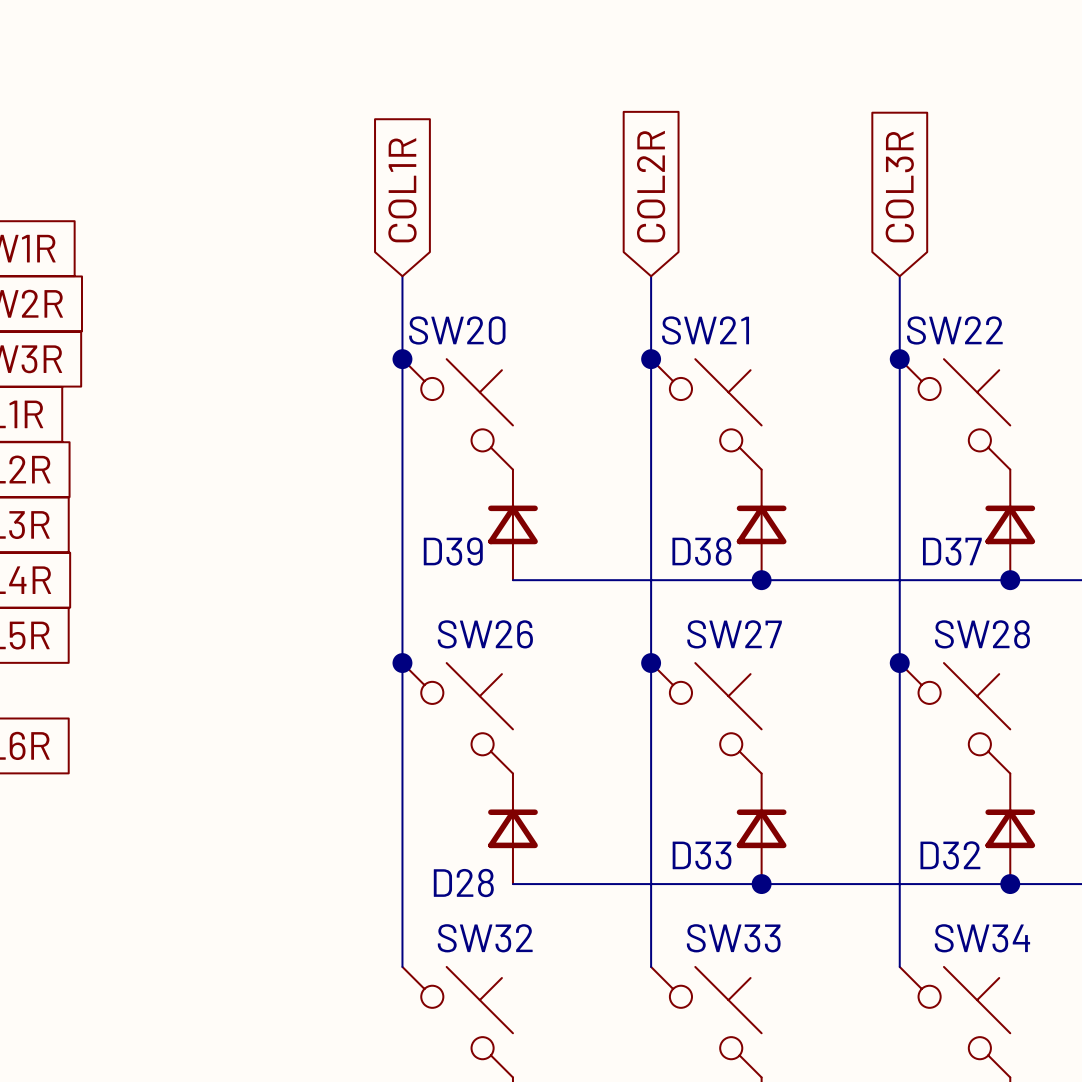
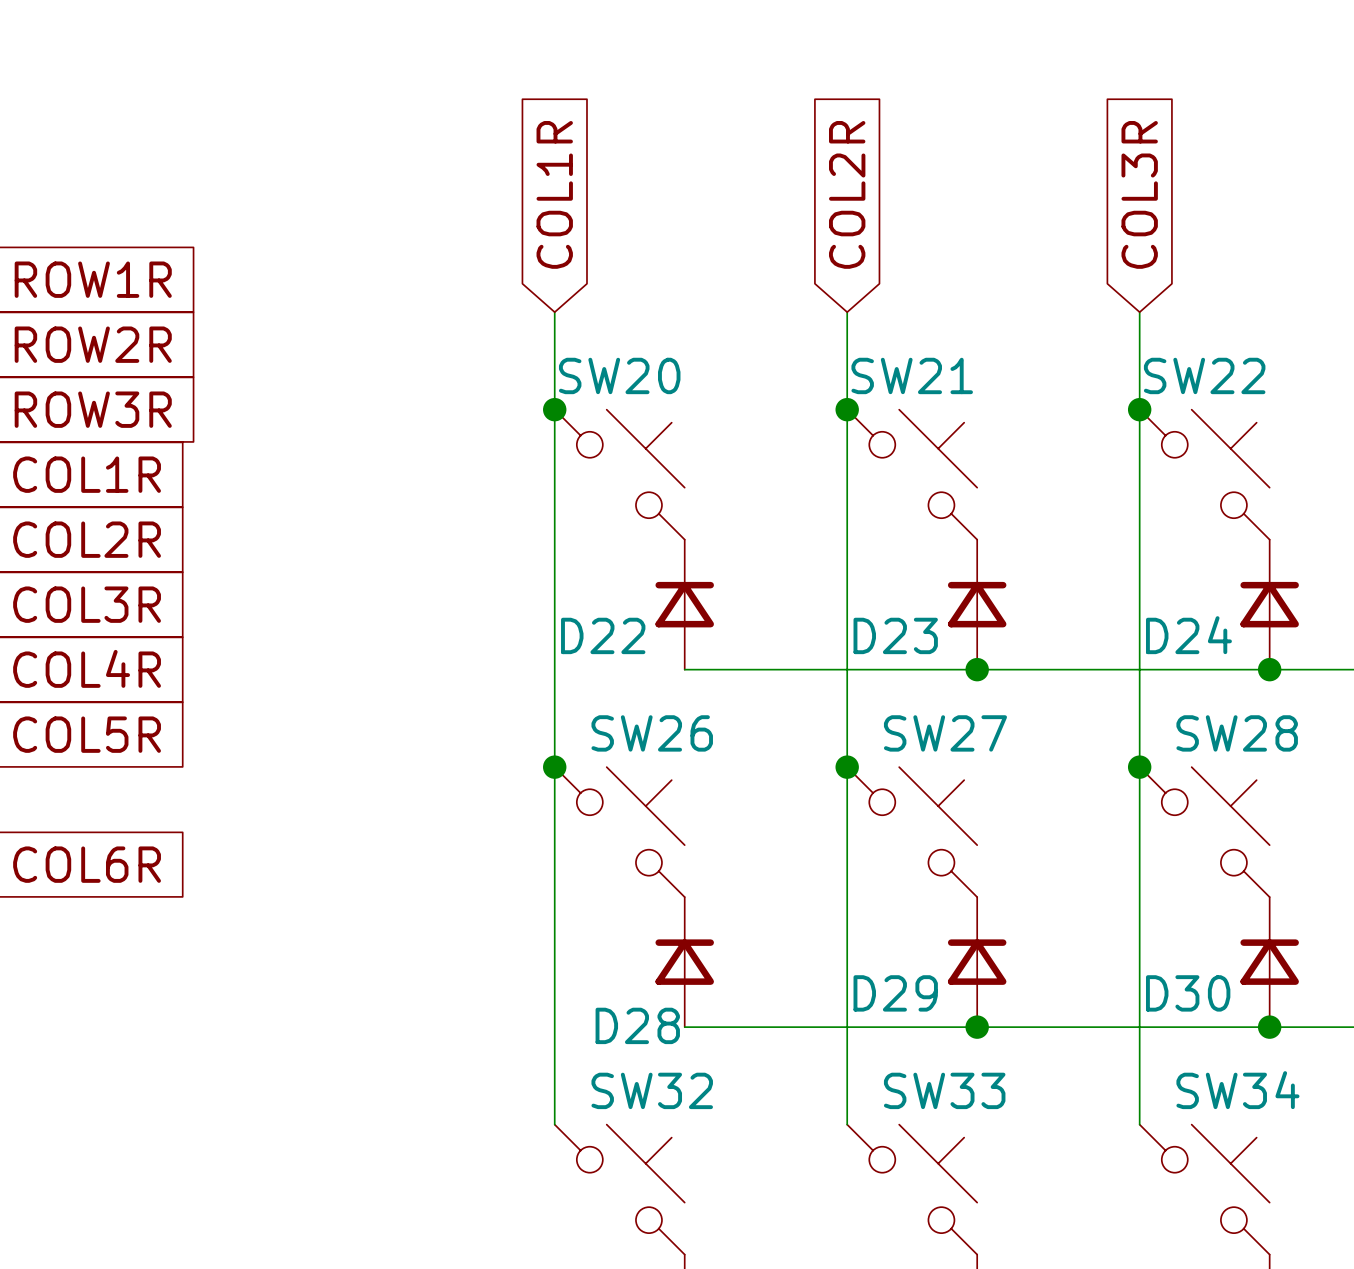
D39 name: D39 (453, 551) -> D22 (603, 635)
D38 name: D38 (702, 551) -> D23 (895, 635)
D37 name: D37 (952, 551) -> D24 (1188, 635)
D33 name: D33 (702, 855) -> D29 (895, 993)
D32 name: D32 (950, 855) -> D30 (1188, 993)

